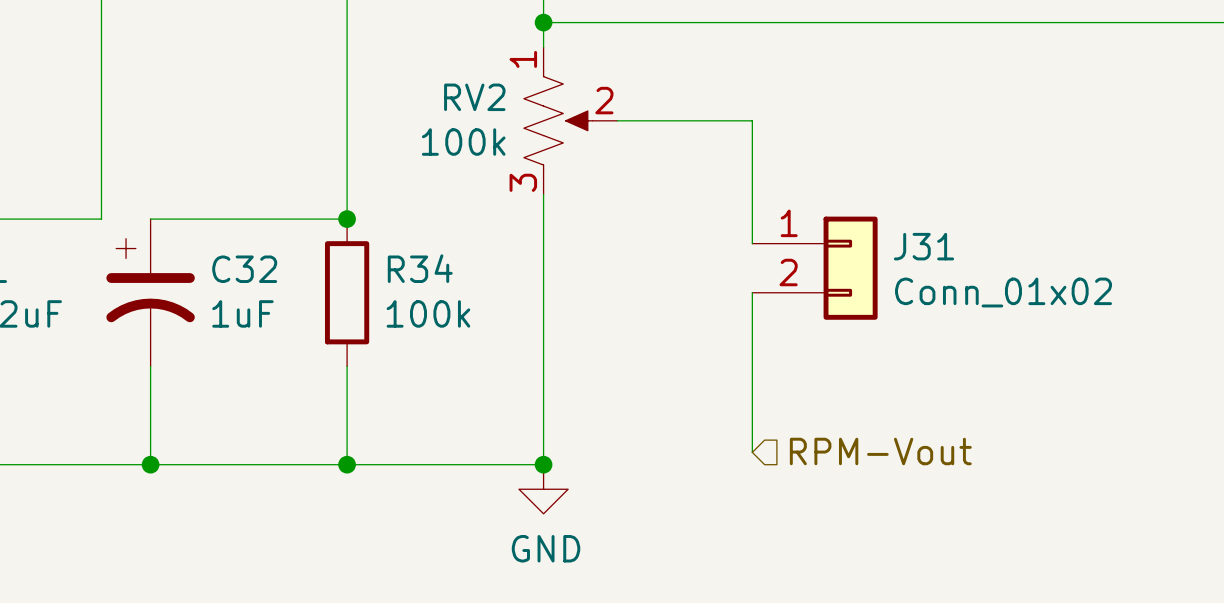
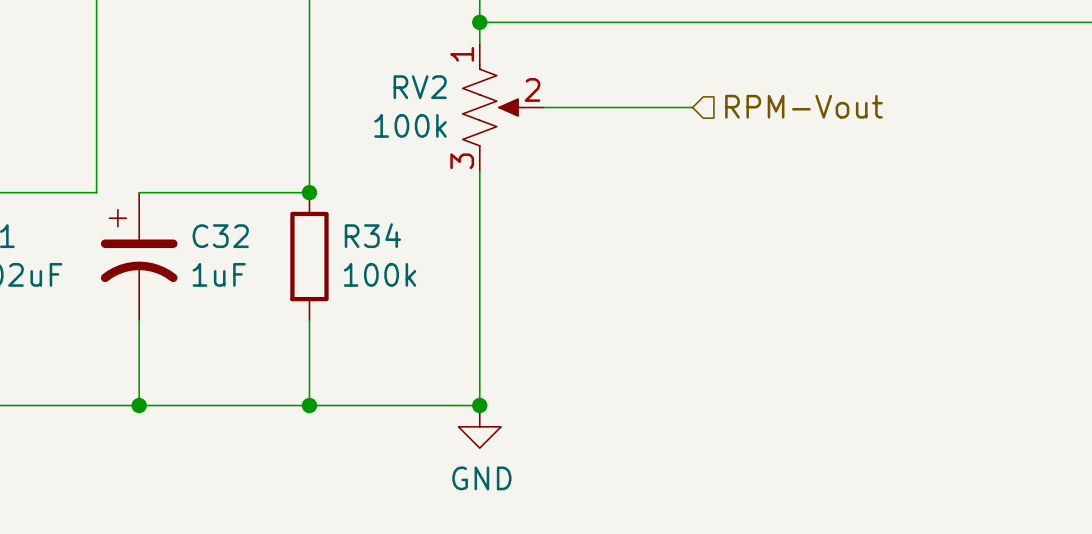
wire: (752, 120) (752, 243) -> (660, 107) (692, 107)
J31: Conn_01x02 (814, 268) -> none
wire: (752, 292) (752, 452) -> none
hierarchical label position: RPM-Vout (880, 451) -> RPM-Vout (803, 106)

